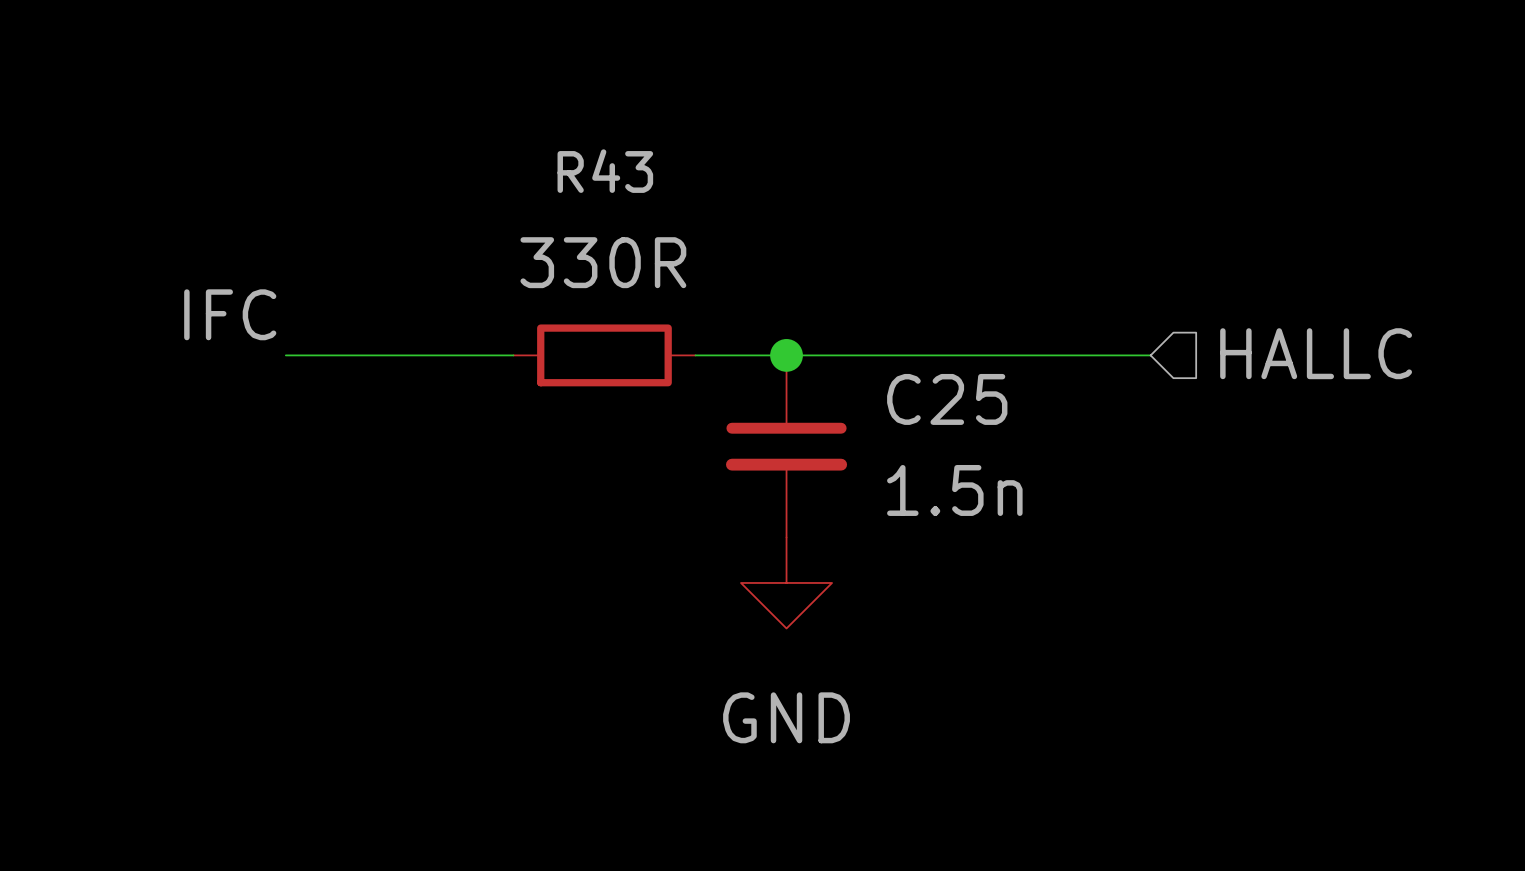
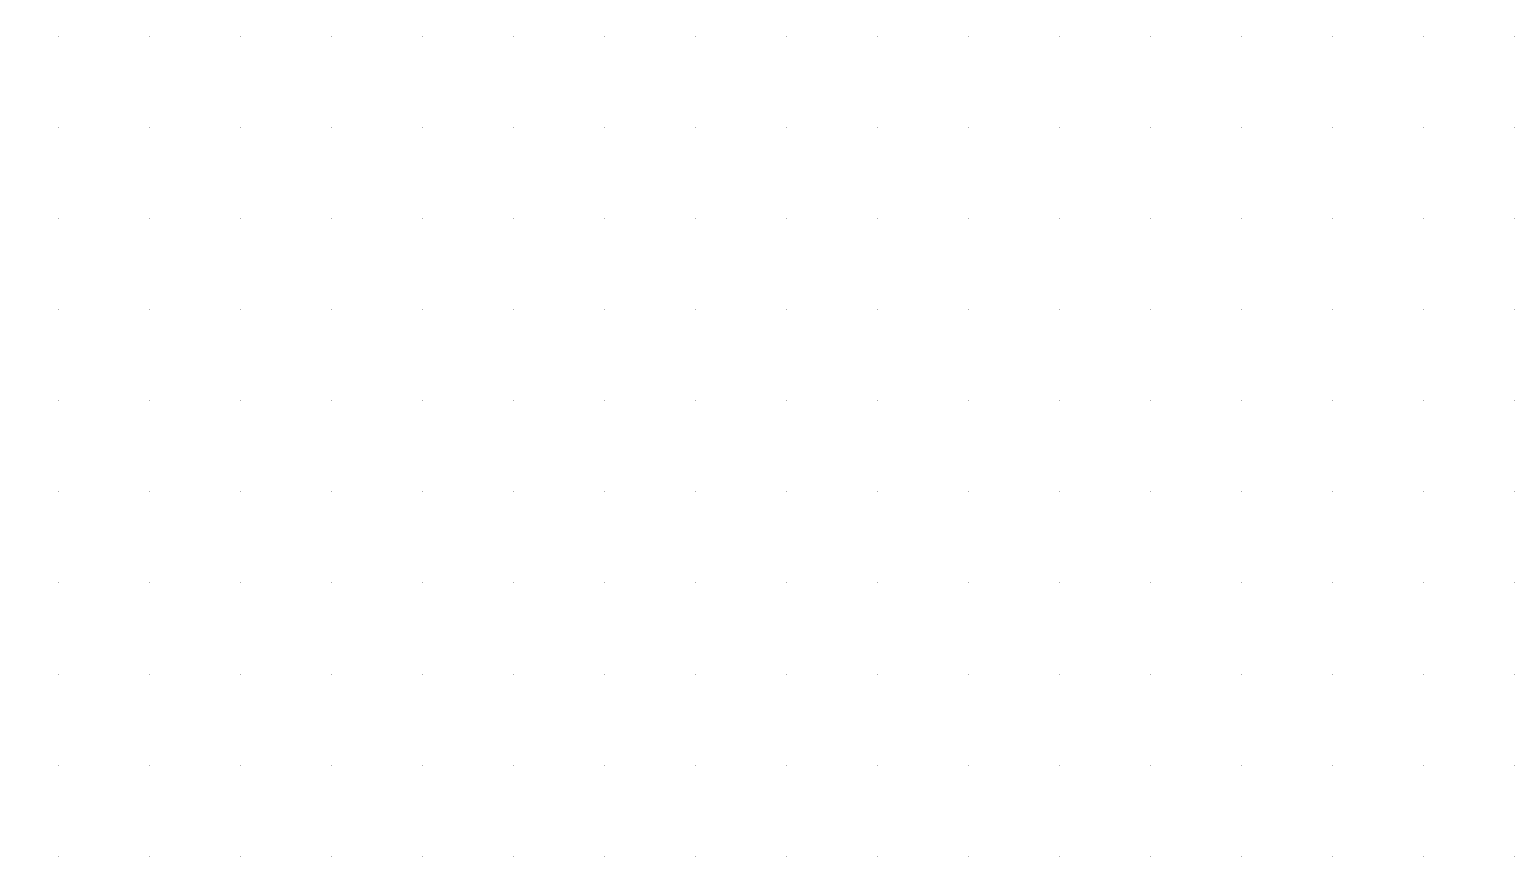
label: IFC (230, 314) -> none
hierarchical label: HALLC (1316, 353) -> none
wire: (285, 355) (513, 355) -> none
R43: 330R (604, 355) -> none
wire: (695, 355) (1150, 355) -> none
junction: (786, 355) -> none
C25: 1.5n (786, 446) -> none
power symbol: GND (786, 582) -> none

